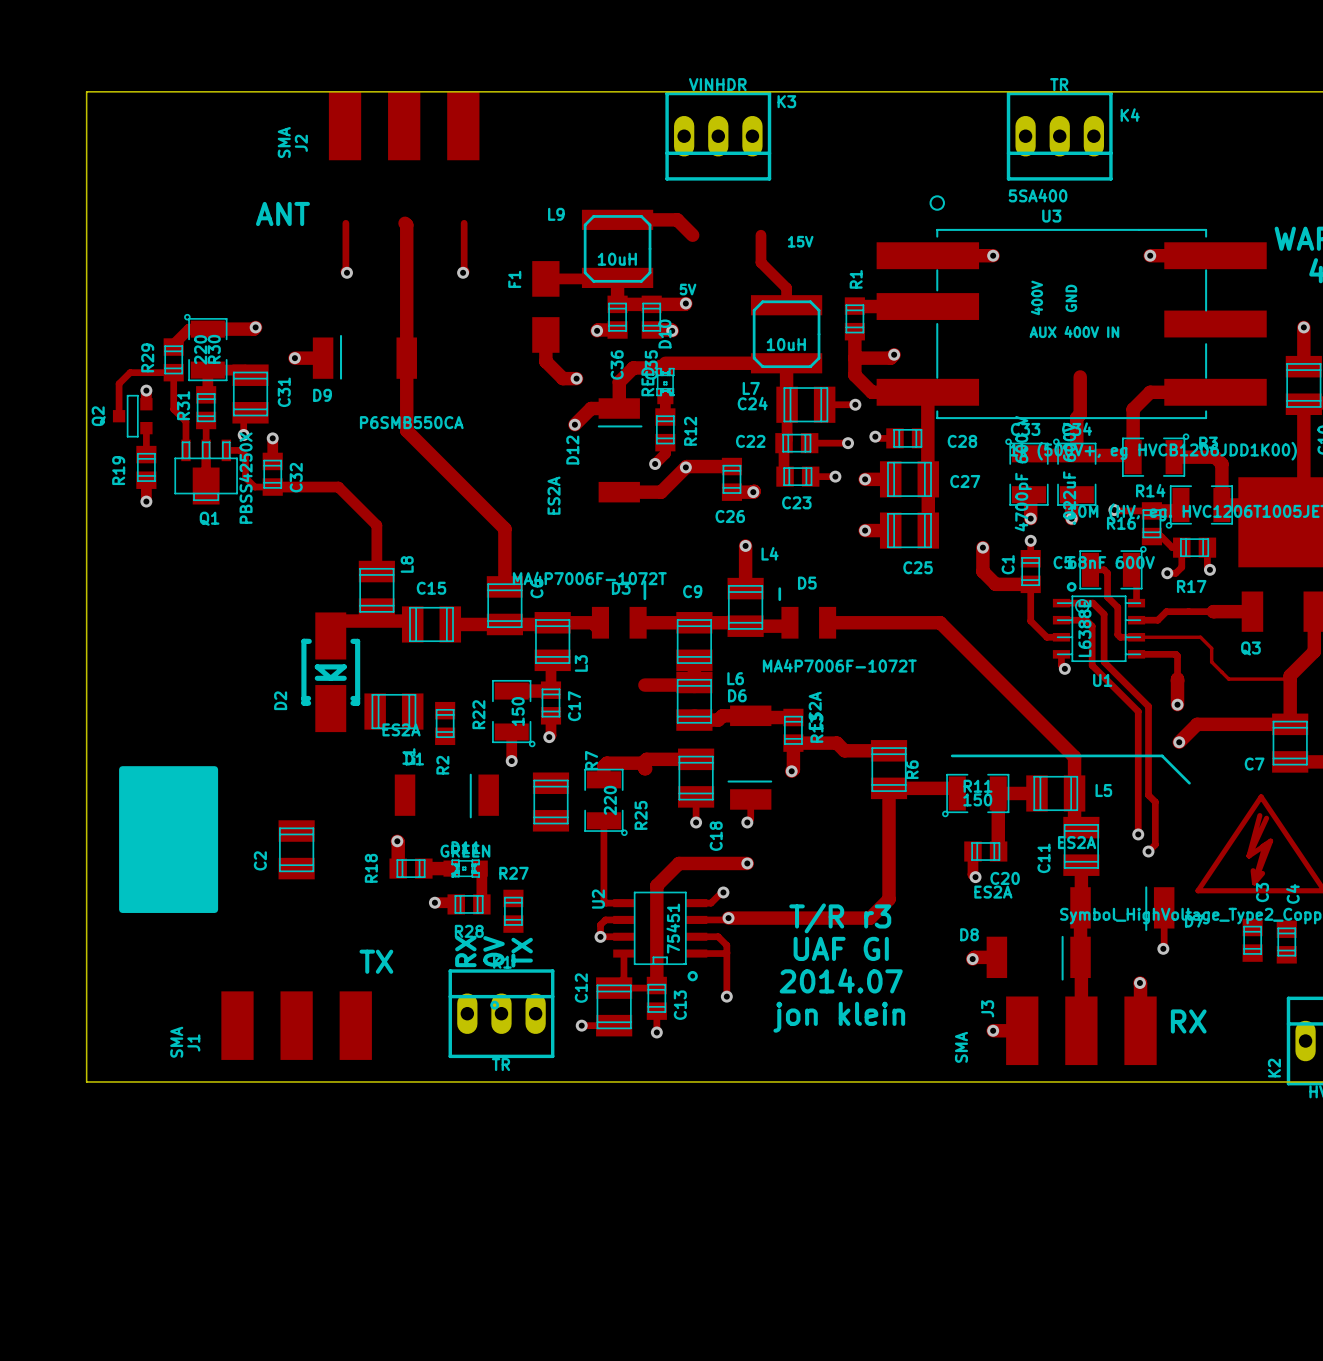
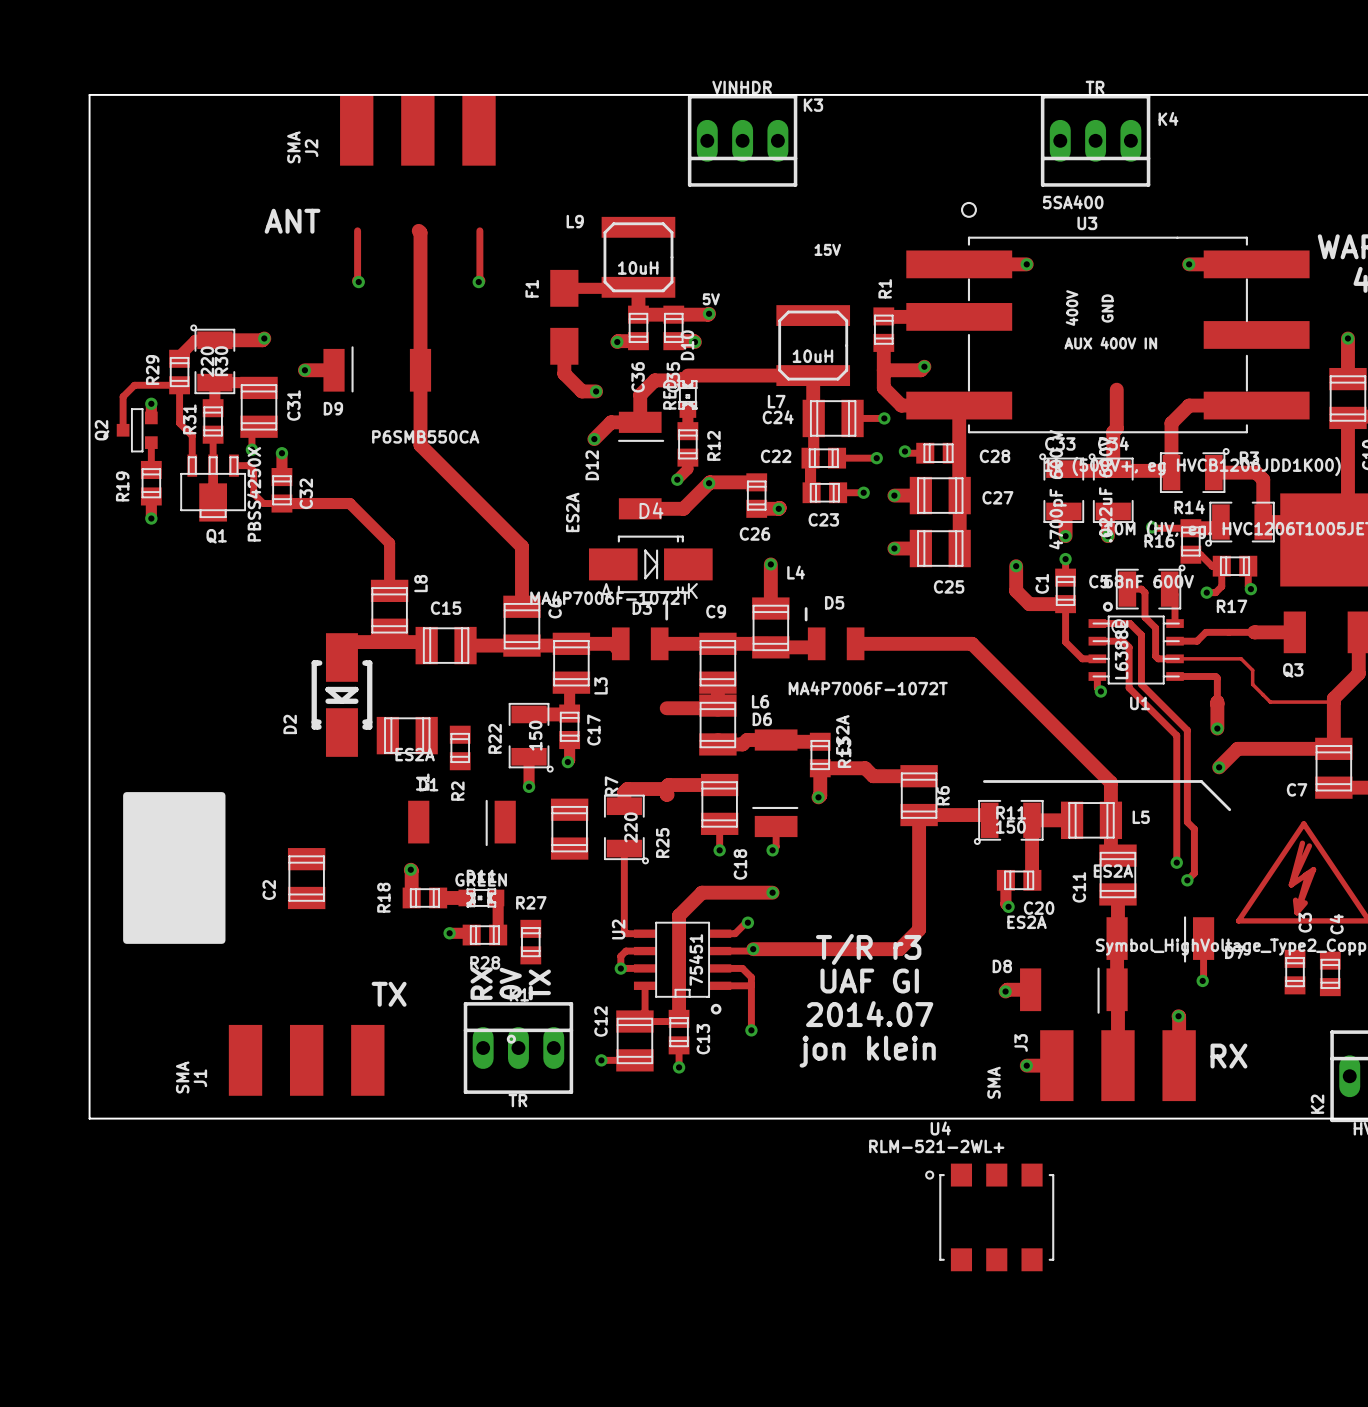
track: (617, 219) (677, 219) (692, 235) -> none
track: (760, 235) (760, 262) (786, 288) (786, 305) -> none
D4: none -> (650, 564)
U4: none -> RLM-521-2WL+ (989, 1217)

